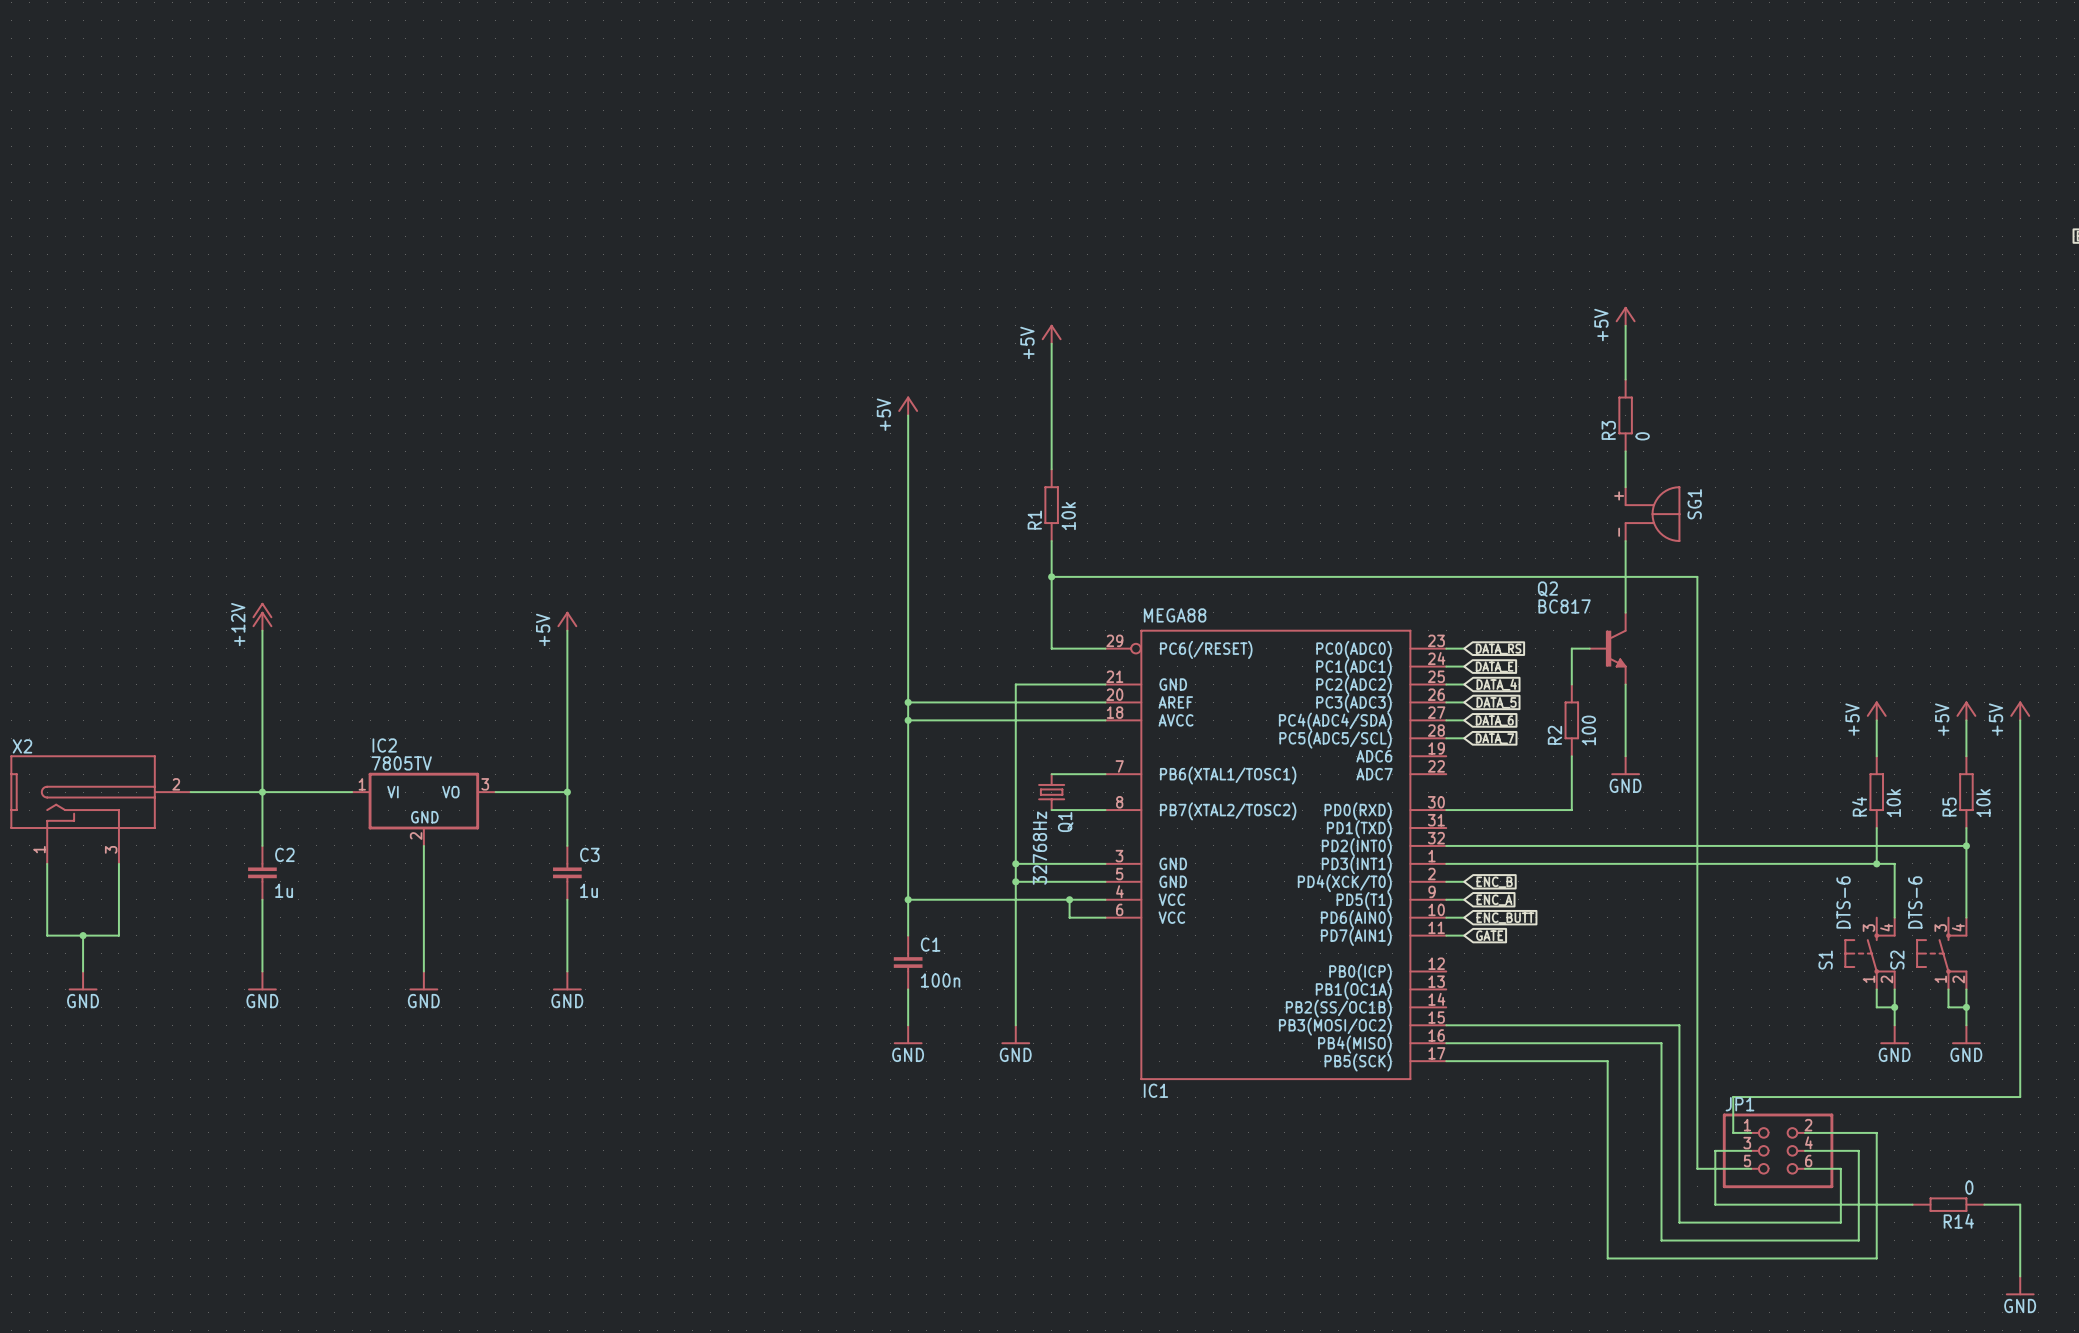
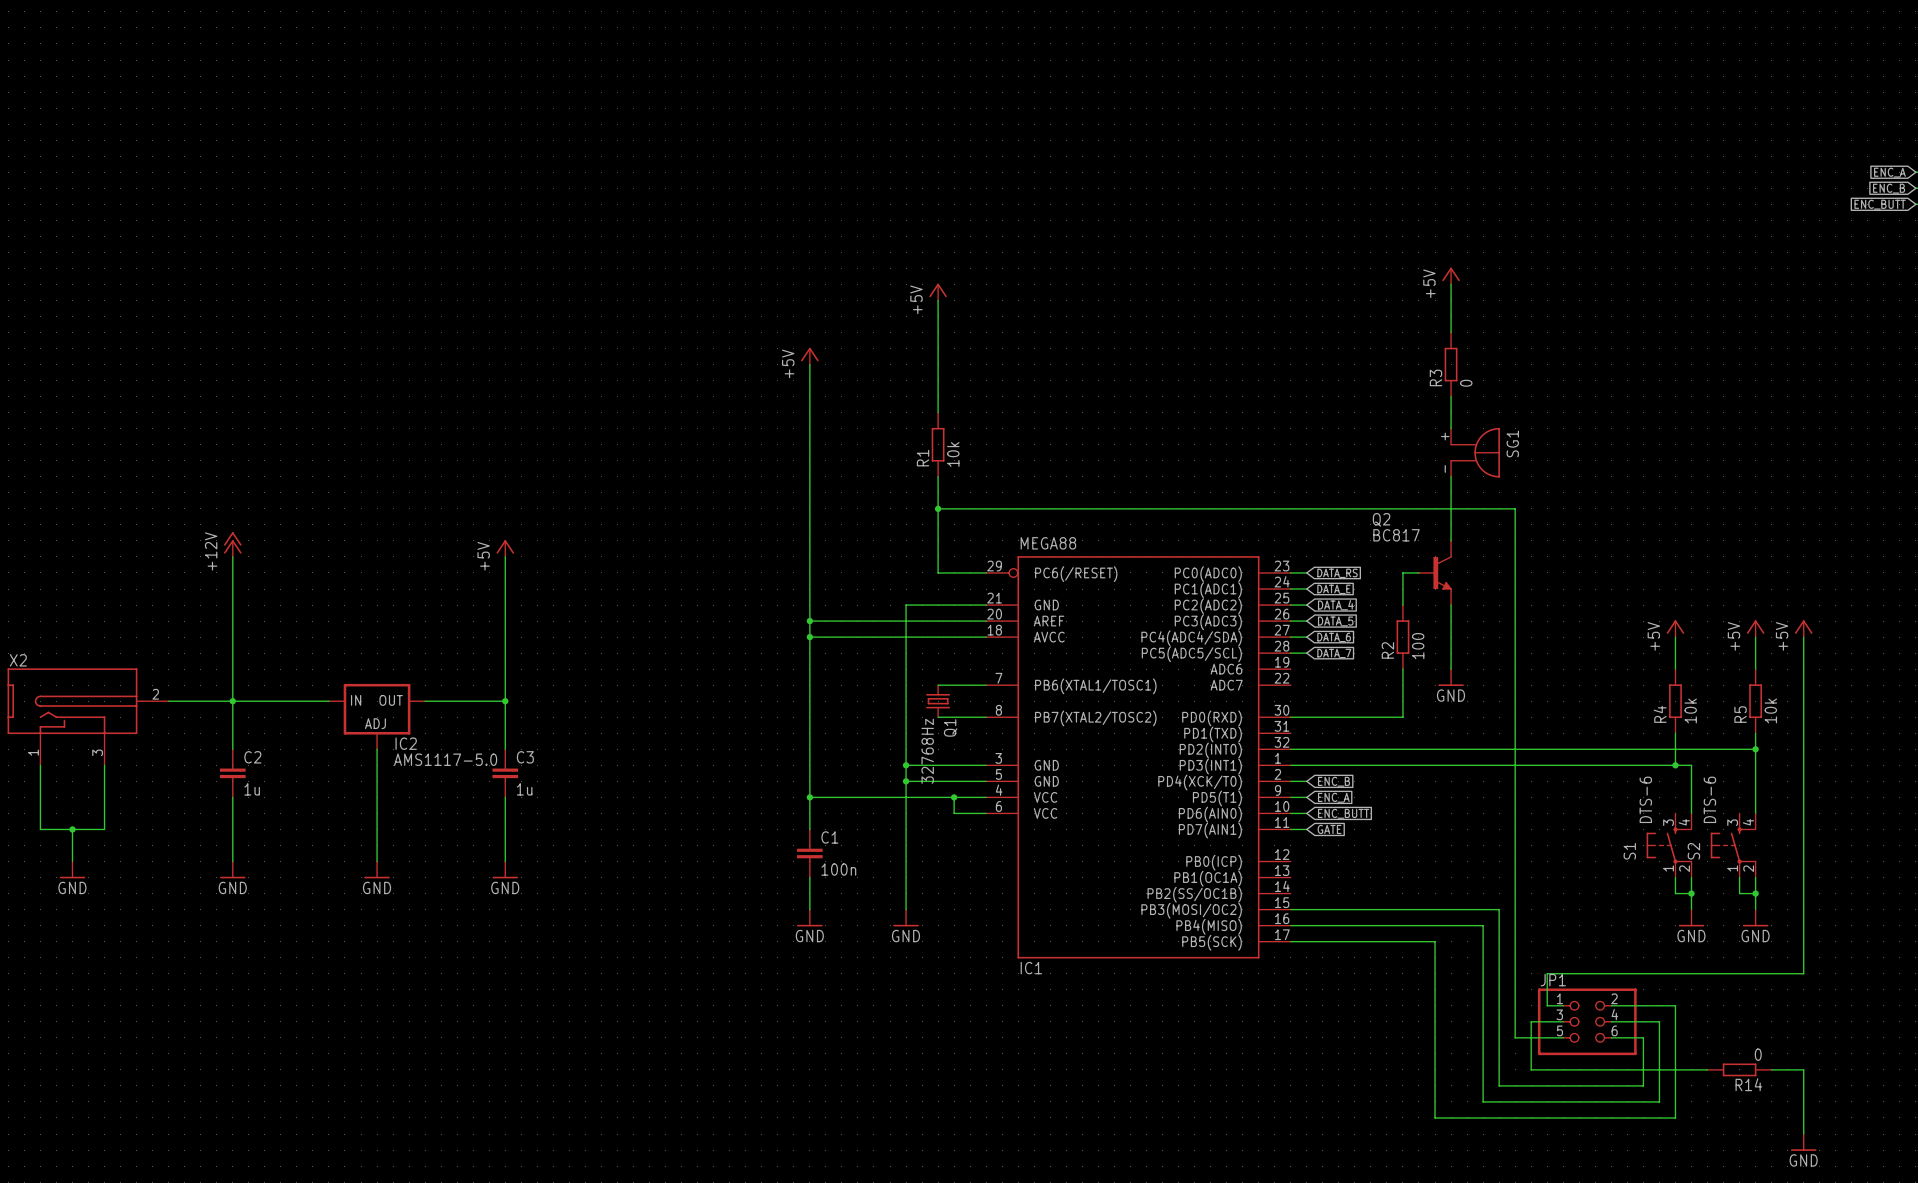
IC2 name position: IC2 (384, 745) -> IC2 (406, 743)
IC2 value: 7805TV (401, 763) -> AMS1117-5.0 (445, 759)
IC2 symbol: [352, 772, 496, 846] -> [328, 683, 426, 750]

